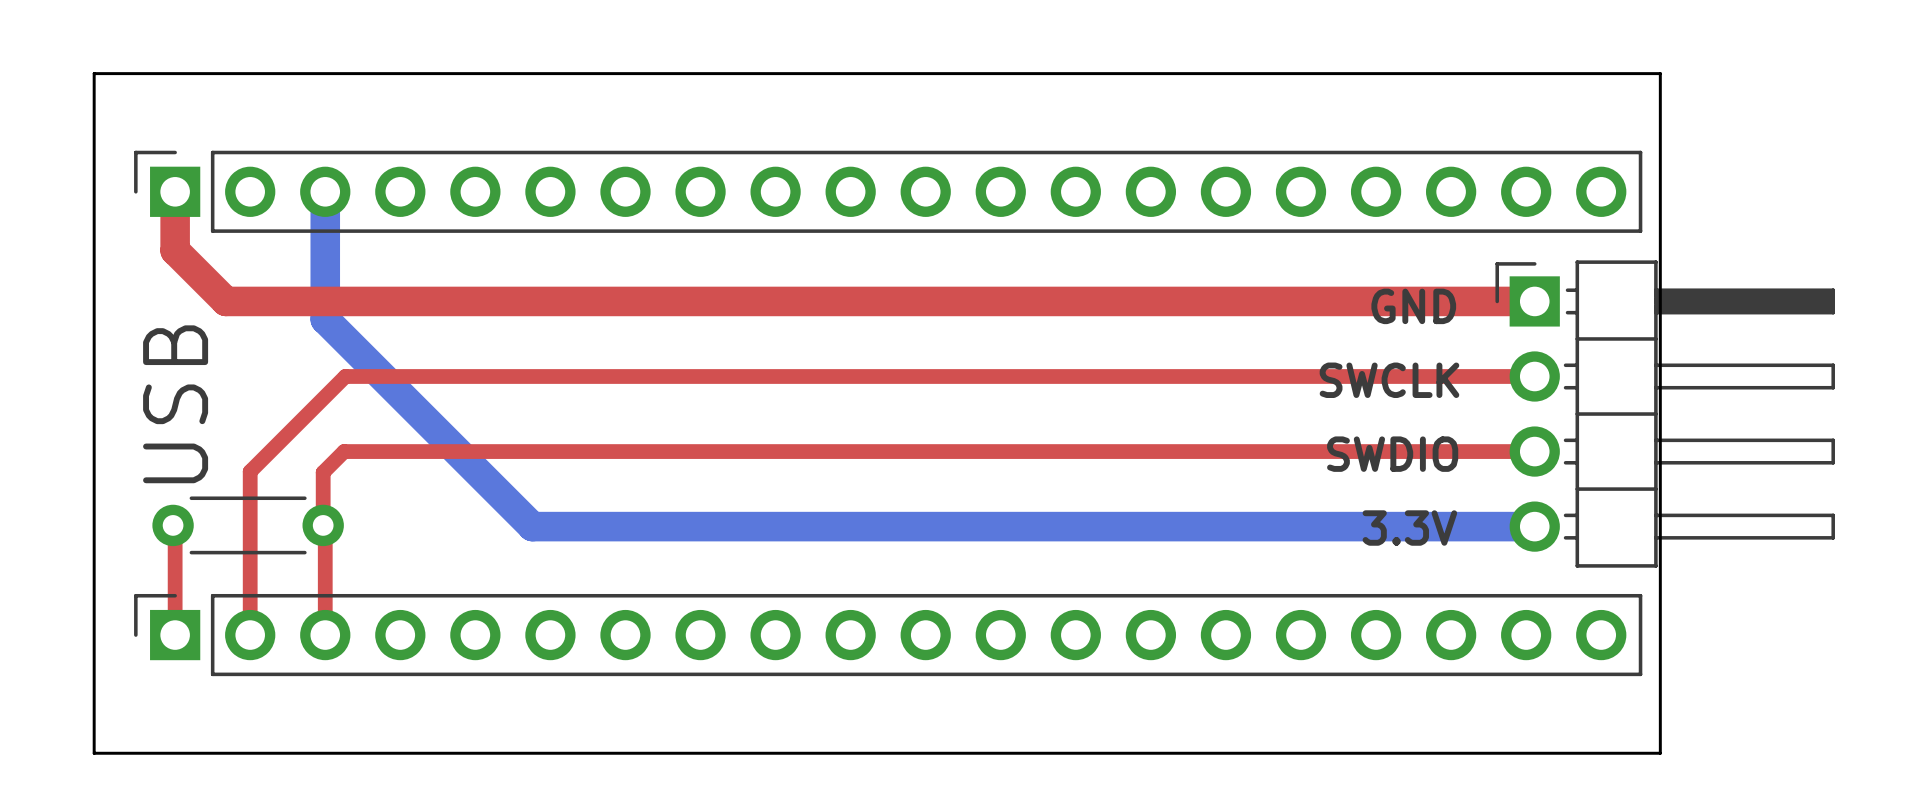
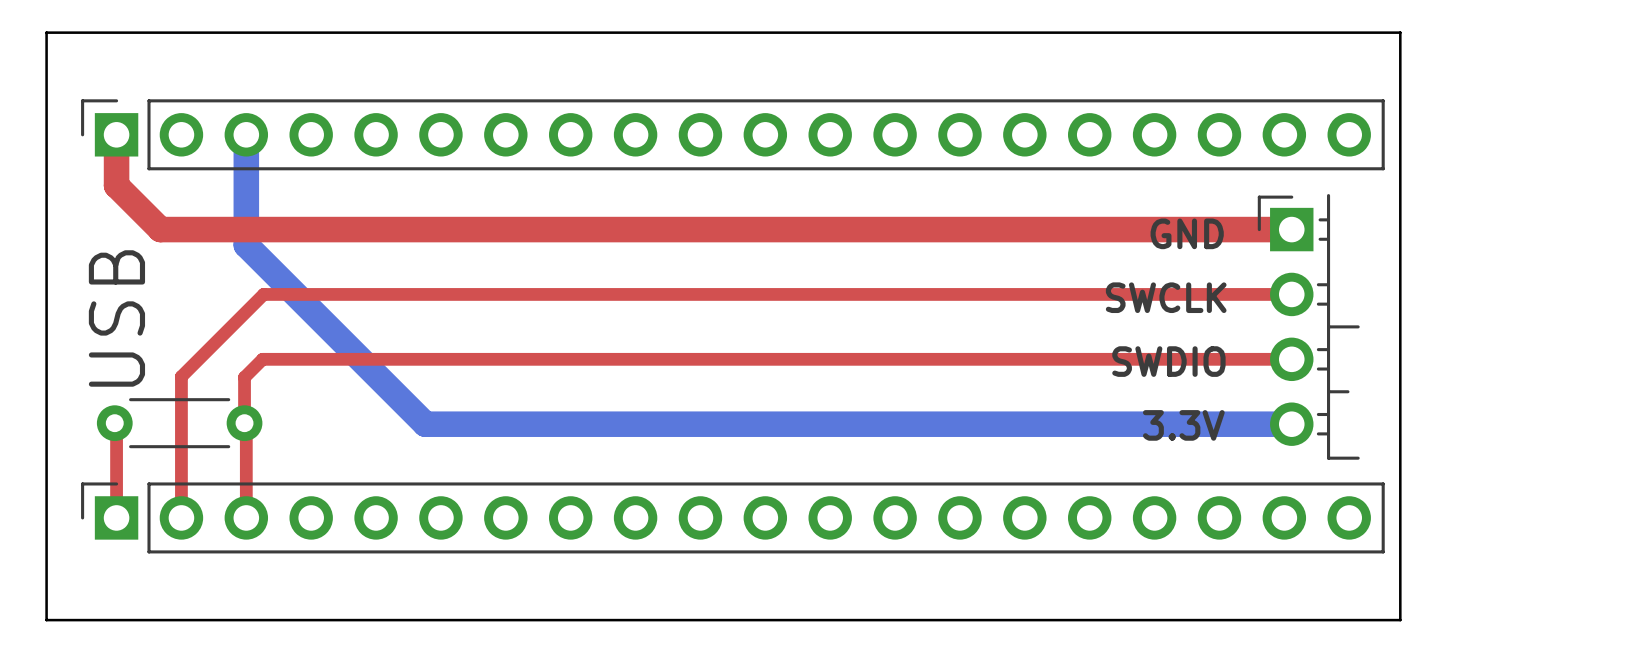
part: none -> (1308, 326)
part: (1665, 414) -> none

